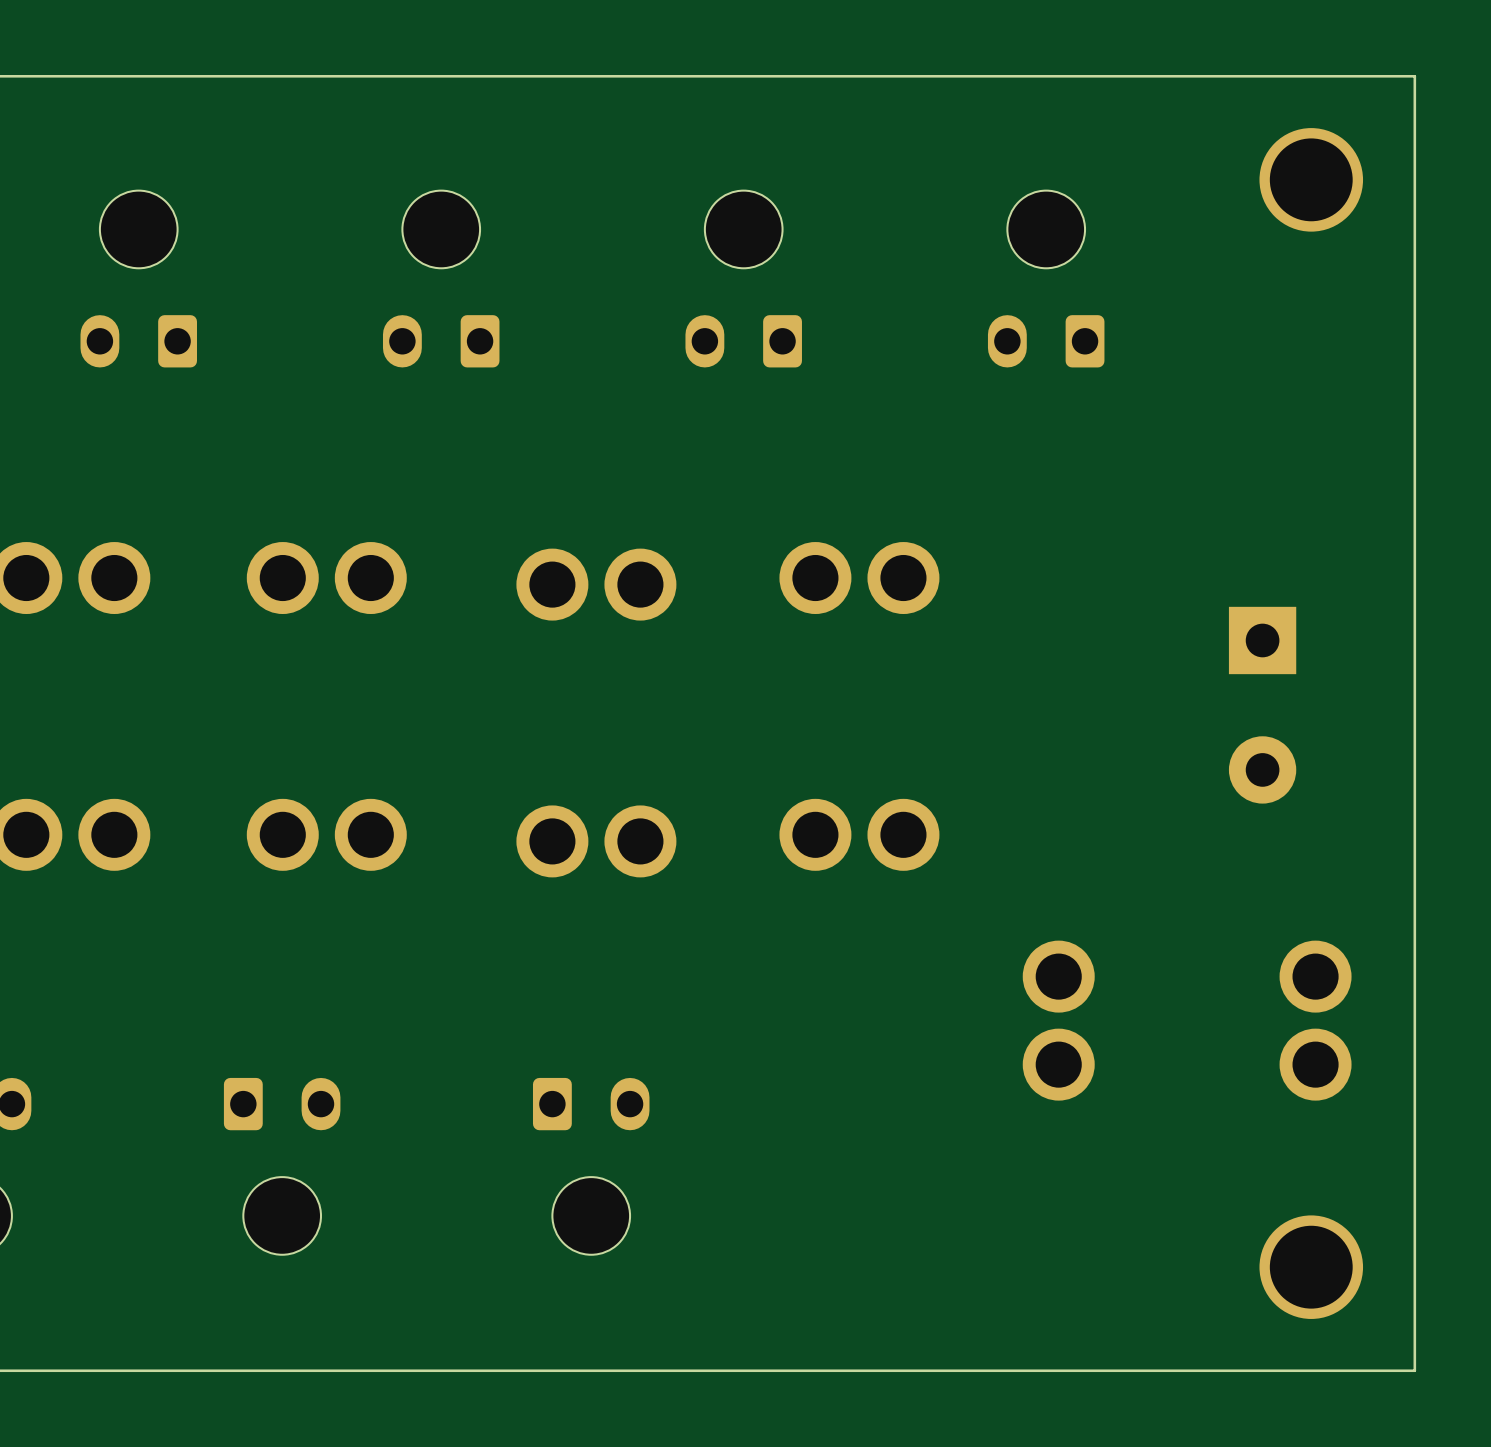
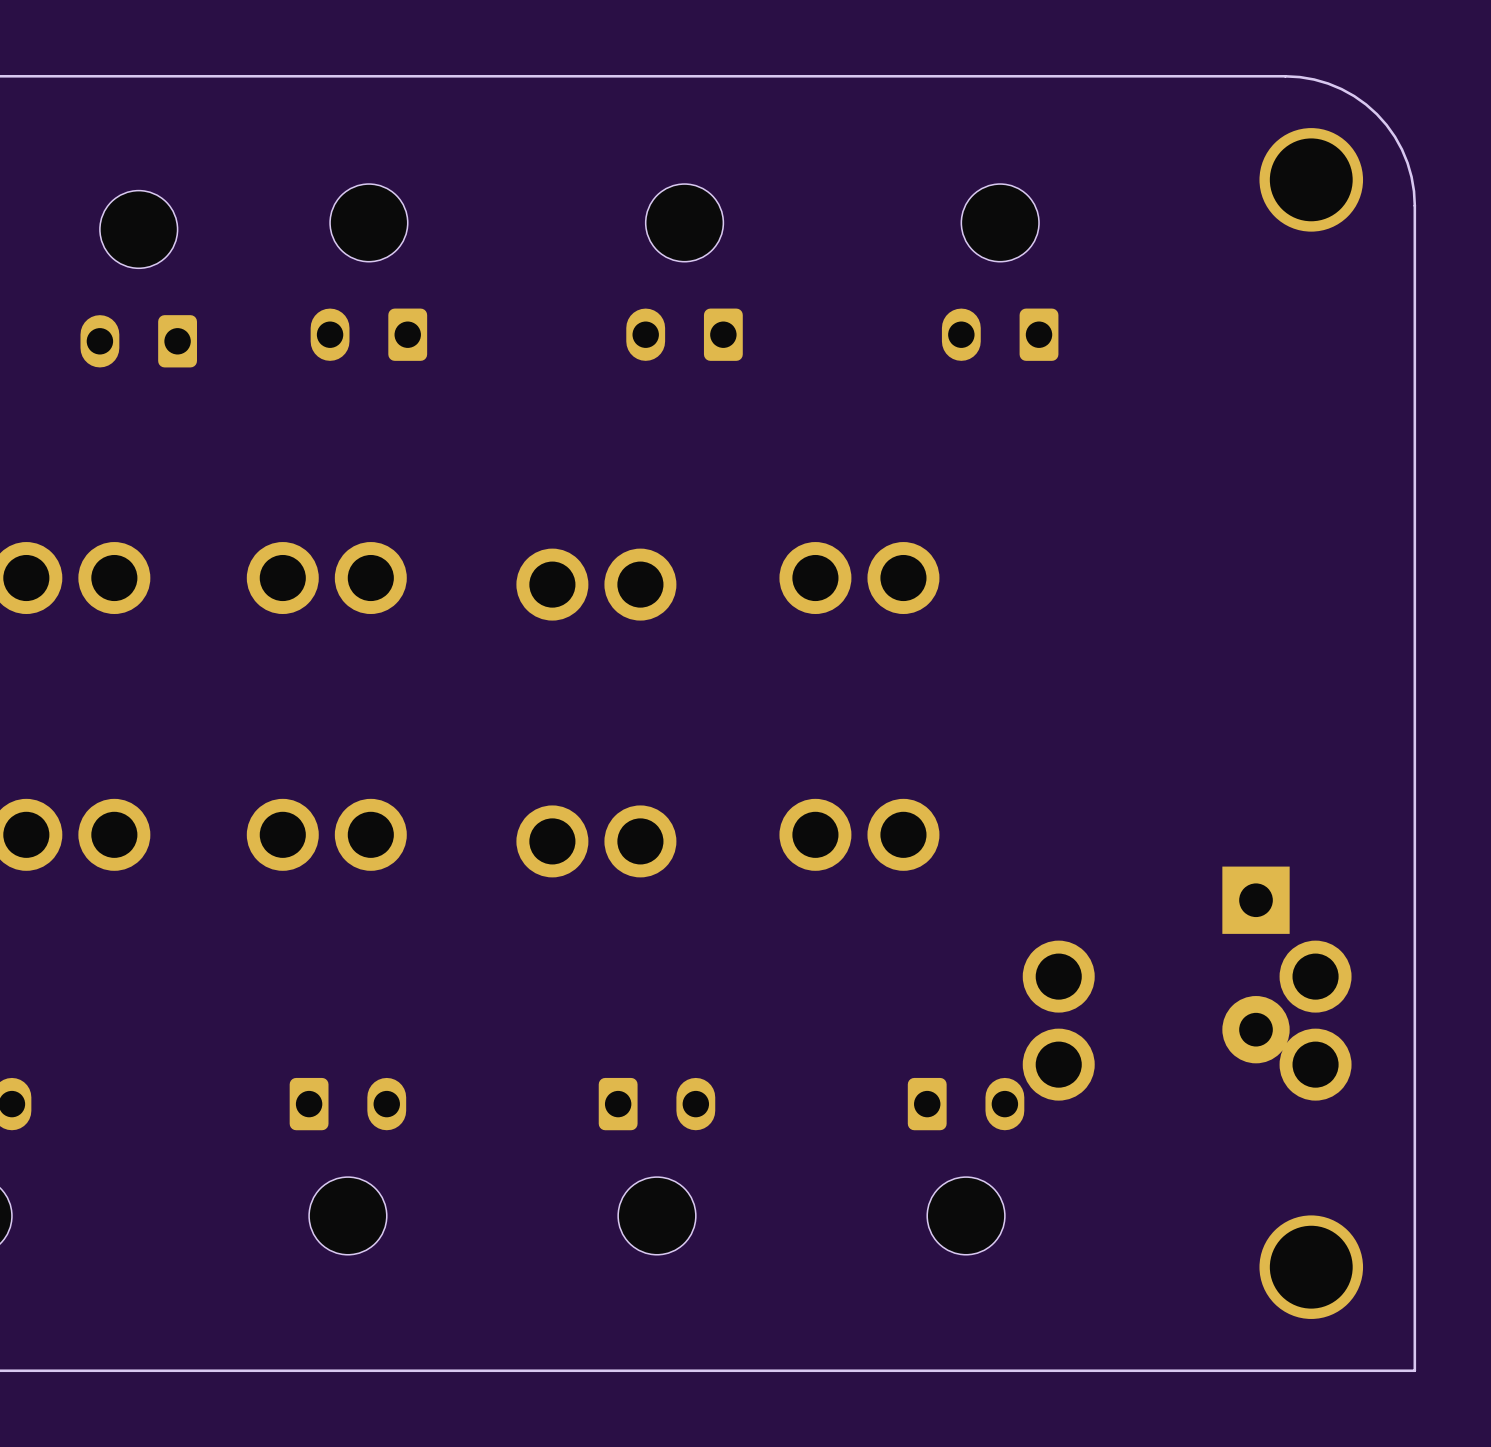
board edge: (1285, 76) (1414, 76) (1414, 205) -> (1285, 76) (1299, 77) (1328, 83) (1354, 96) (1376, 114) (1386, 125) (1401, 149) (1411, 176) (1414, 205)
part position: (441, 279) -> (368, 272)
part position: (743, 279) -> (684, 272)
part position: (1046, 279) -> (1000, 272)
part position: (1262, 705) -> (1256, 964)
part position: (282, 1166) -> (347, 1166)
part position: (591, 1166) -> (656, 1166)
part: none -> (966, 1166)

